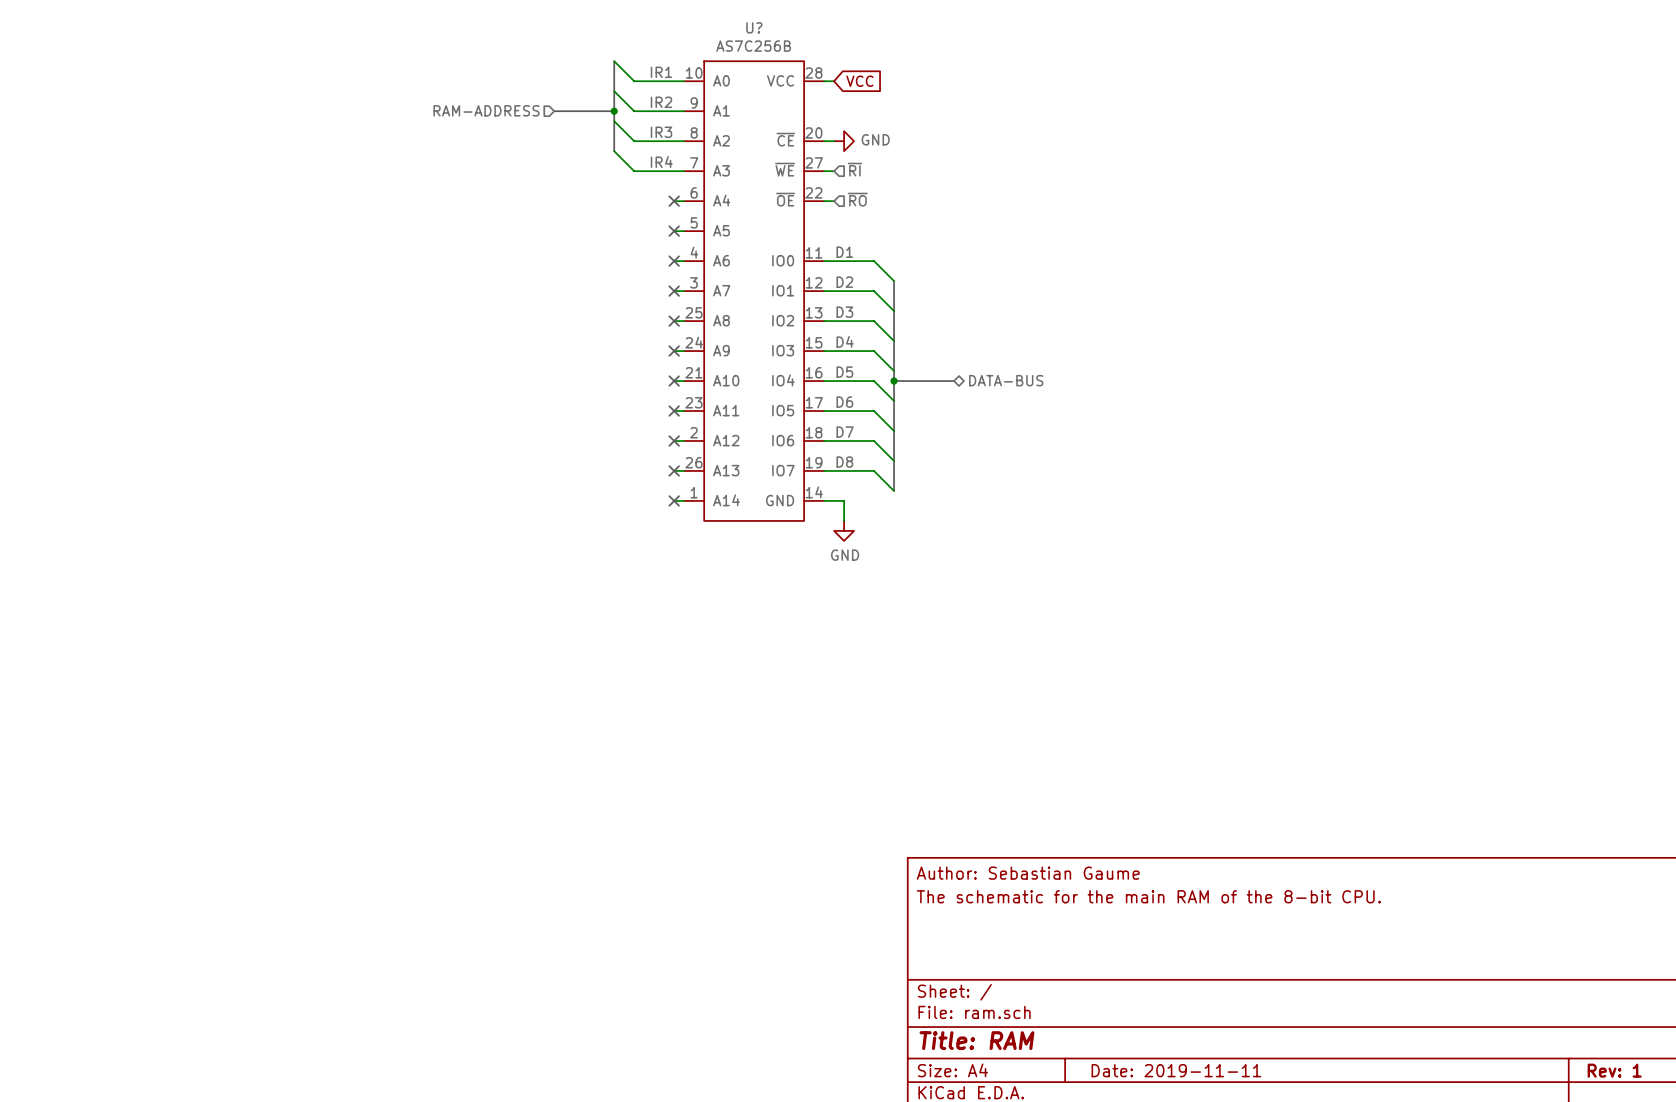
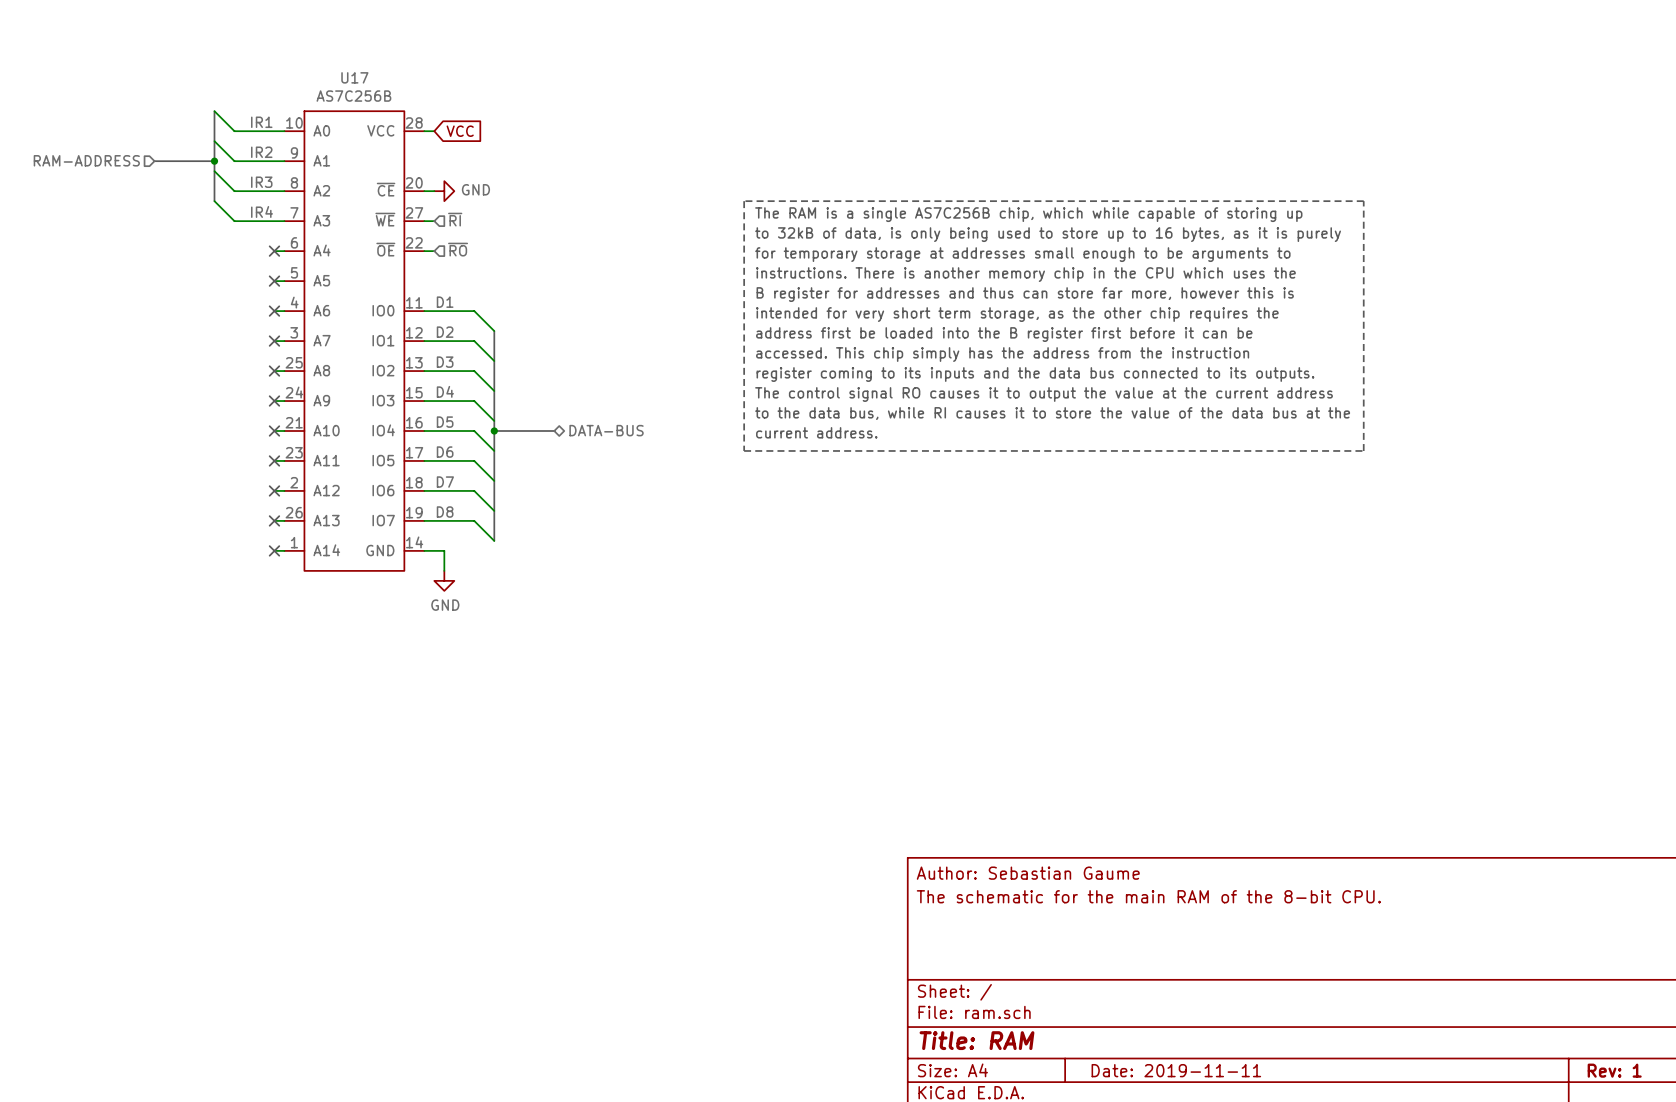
wire: (614, 61) (634, 81) (684, 81) -> none
bus: (614, 61) (614, 151) -> none
label: IR1 (661, 72) -> none
wire: (824, 81) (834, 81) -> none
global label: VCC (859, 81) -> none
wire: (614, 91) (634, 111) (684, 111) -> none
label: IR2 (661, 102) -> none
hierarchical label: RAM-ADDRESS (486, 110) -> none
wire: none -> (214, 111) (234, 131) (284, 131)
bus: none -> (214, 111) (214, 201)
bus: (554, 111) (614, 111) -> none
junction: (614, 111) -> none
wire: (614, 121) (634, 141) (684, 141) -> none
label: none -> IR1 (261, 122)
wire: none -> (424, 131) (434, 131)
global label: none -> VCC (460, 131)
label: IR3 (661, 132) -> none
wire: none -> (214, 141) (234, 161) (284, 161)
wire: (824, 141) (834, 141) -> none
power symbol: GND (844, 141) -> none
wire: (614, 151) (634, 171) (684, 171) -> none
label: none -> IR2 (261, 152)
hierarchical label: none -> RAM-ADDRESS (86, 160)
bus: none -> (154, 161) (214, 161)
junction: none -> (214, 161)
label: IR4 (661, 162) -> none
hierarchical label: ~{RI} (854, 169) -> none
wire: none -> (214, 171) (234, 191) (284, 191)
wire: (824, 171) (834, 171) -> none
label: none -> IR3 (261, 182)
wire: none -> (424, 191) (434, 191)
power symbol: none -> GND (444, 191)
hierarchical label: ~{RO} (857, 199) -> none
wire: none -> (214, 201) (234, 221) (284, 221)
wire: (674, 201) (684, 201) -> none
no-connect mark: (674, 201) -> none
line: none -> (744, 201) (744, 450) (1363, 450) (1363, 201) (744, 201)
label: none -> IR4 (262, 211)
text: none -> The RAM is a single AS7C256B chip, which while capable of storing up (1028, 214)
hierarchical label: none -> ~{RI} (455, 219)
wire: none -> (424, 221) (434, 221)
wire: (674, 231) (684, 231) -> none
no-connect mark: (674, 231) -> none
text: none -> to 32kB of data, is only being used to store up to 16 bytes, as it is purely (1048, 234)
hierarchical label: none -> ~{RO} (458, 249)
wire: none -> (274, 251) (284, 251)
no-connect mark: none -> (274, 251)
wire: none -> (424, 251) (434, 251)
label: D1 (844, 252) -> none
text: none -> for temporary storage at addresses small enough to be arguments to (1022, 254)
wire: (674, 261) (684, 261) -> none
no-connect mark: (674, 261) -> none
wire: (824, 261) (874, 261) (894, 281) -> none
text: none -> instructions. There is another memory chip in the CPU which uses the (1025, 274)
wire: none -> (274, 281) (284, 281)
no-connect mark: none -> (274, 281)
bus: (894, 281) (894, 490) -> none
label: D2 (844, 282) -> none
wire: (674, 291) (684, 291) -> none
no-connect mark: (674, 291) -> none
U?: AS7C256B (754, 291) -> none
wire: (824, 291) (874, 291) (894, 311) -> none
text: none -> B register for addresses and thus can store far more, however this is (1025, 294)
label: none -> D1 (445, 302)
wire: none -> (274, 311) (284, 311)
no-connect mark: none -> (274, 311)
wire: none -> (424, 311) (474, 311) (494, 331)
label: D3 (844, 312) -> none
text: none -> intended for very short term storage, as the other chip requires the (1017, 314)
wire: (674, 321) (684, 321) -> none
no-connect mark: (674, 321) -> none
wire: (824, 321) (874, 321) (894, 341) -> none
bus: none -> (494, 331) (494, 540)
label: none -> D2 (445, 332)
text: none -> address first be loaded into the B register first before it can be (1004, 334)
wire: none -> (274, 341) (284, 341)
no-connect mark: none -> (274, 341)
U17: none -> AS7C256B (354, 341)
wire: none -> (424, 341) (474, 341) (494, 361)
label: D4 (845, 341) -> none
wire: (674, 351) (684, 351) -> none
no-connect mark: (674, 351) -> none
wire: (824, 351) (874, 351) (894, 371) -> none
text: none -> accessed. This chip simply has the address from the instruction (1002, 354)
label: none -> D3 (445, 362)
wire: none -> (274, 371) (284, 371)
no-connect mark: none -> (274, 371)
wire: none -> (424, 371) (474, 371) (494, 391)
label: D5 (844, 372) -> none
text: none -> register coming to its inputs and the data bus connected to its outputs. (1035, 374)
hierarchical label: DATA-BUS (1006, 380) -> none
wire: (674, 381) (684, 381) -> none
no-connect mark: (674, 381) -> none
wire: (824, 381) (874, 381) (894, 401) -> none
bus: (894, 381) (954, 381) -> none
junction: (894, 381) -> none
label: none -> D4 (445, 391)
text: none -> The control signal RO causes it to output the value at the current address (1044, 394)
wire: none -> (274, 401) (284, 401)
no-connect mark: none -> (274, 401)
wire: none -> (424, 401) (474, 401) (494, 421)
label: D6 (844, 402) -> none
wire: (674, 411) (684, 411) -> none
no-connect mark: (674, 411) -> none
wire: (824, 411) (874, 411) (894, 431) -> none
text: none -> to the data bus, while RI causes it to store the value of the data bus at the (1052, 413)
label: none -> D5 (445, 422)
hierarchical label: none -> DATA-BUS (606, 430)
wire: none -> (274, 431) (284, 431)
no-connect mark: none -> (274, 431)
wire: none -> (424, 431) (474, 431) (494, 450)
bus: none -> (494, 431) (554, 431)
junction: none -> (494, 431)
text: none -> current address. (816, 432)
label: D7 (845, 432) -> none
wire: (674, 440) (684, 440) -> none
no-connect mark: (674, 440) -> none
wire: (824, 440) (874, 440) (894, 460) -> none
label: none -> D6 (445, 452)
wire: none -> (274, 460) (284, 460)
no-connect mark: none -> (274, 460)
wire: none -> (424, 460) (474, 460) (494, 480)
label: D8 (844, 462) -> none
wire: (674, 470) (684, 470) -> none
no-connect mark: (674, 470) -> none
wire: (824, 470) (874, 470) (894, 490) -> none
label: none -> D7 (445, 482)
wire: none -> (274, 490) (284, 490)
no-connect mark: none -> (274, 490)
wire: none -> (424, 490) (474, 490) (494, 510)
wire: (674, 500) (684, 500) -> none
no-connect mark: (674, 500) -> none
wire: (824, 500) (844, 500) (844, 520) -> none
label: none -> D8 (445, 512)
wire: none -> (274, 520) (284, 520)
no-connect mark: none -> (274, 520)
wire: none -> (424, 520) (474, 520) (494, 540)
power symbol: GND (844, 530) -> none
wire: none -> (274, 550) (284, 550)
no-connect mark: none -> (274, 550)
wire: none -> (424, 550) (444, 550) (444, 570)
power symbol: none -> GND (444, 580)

